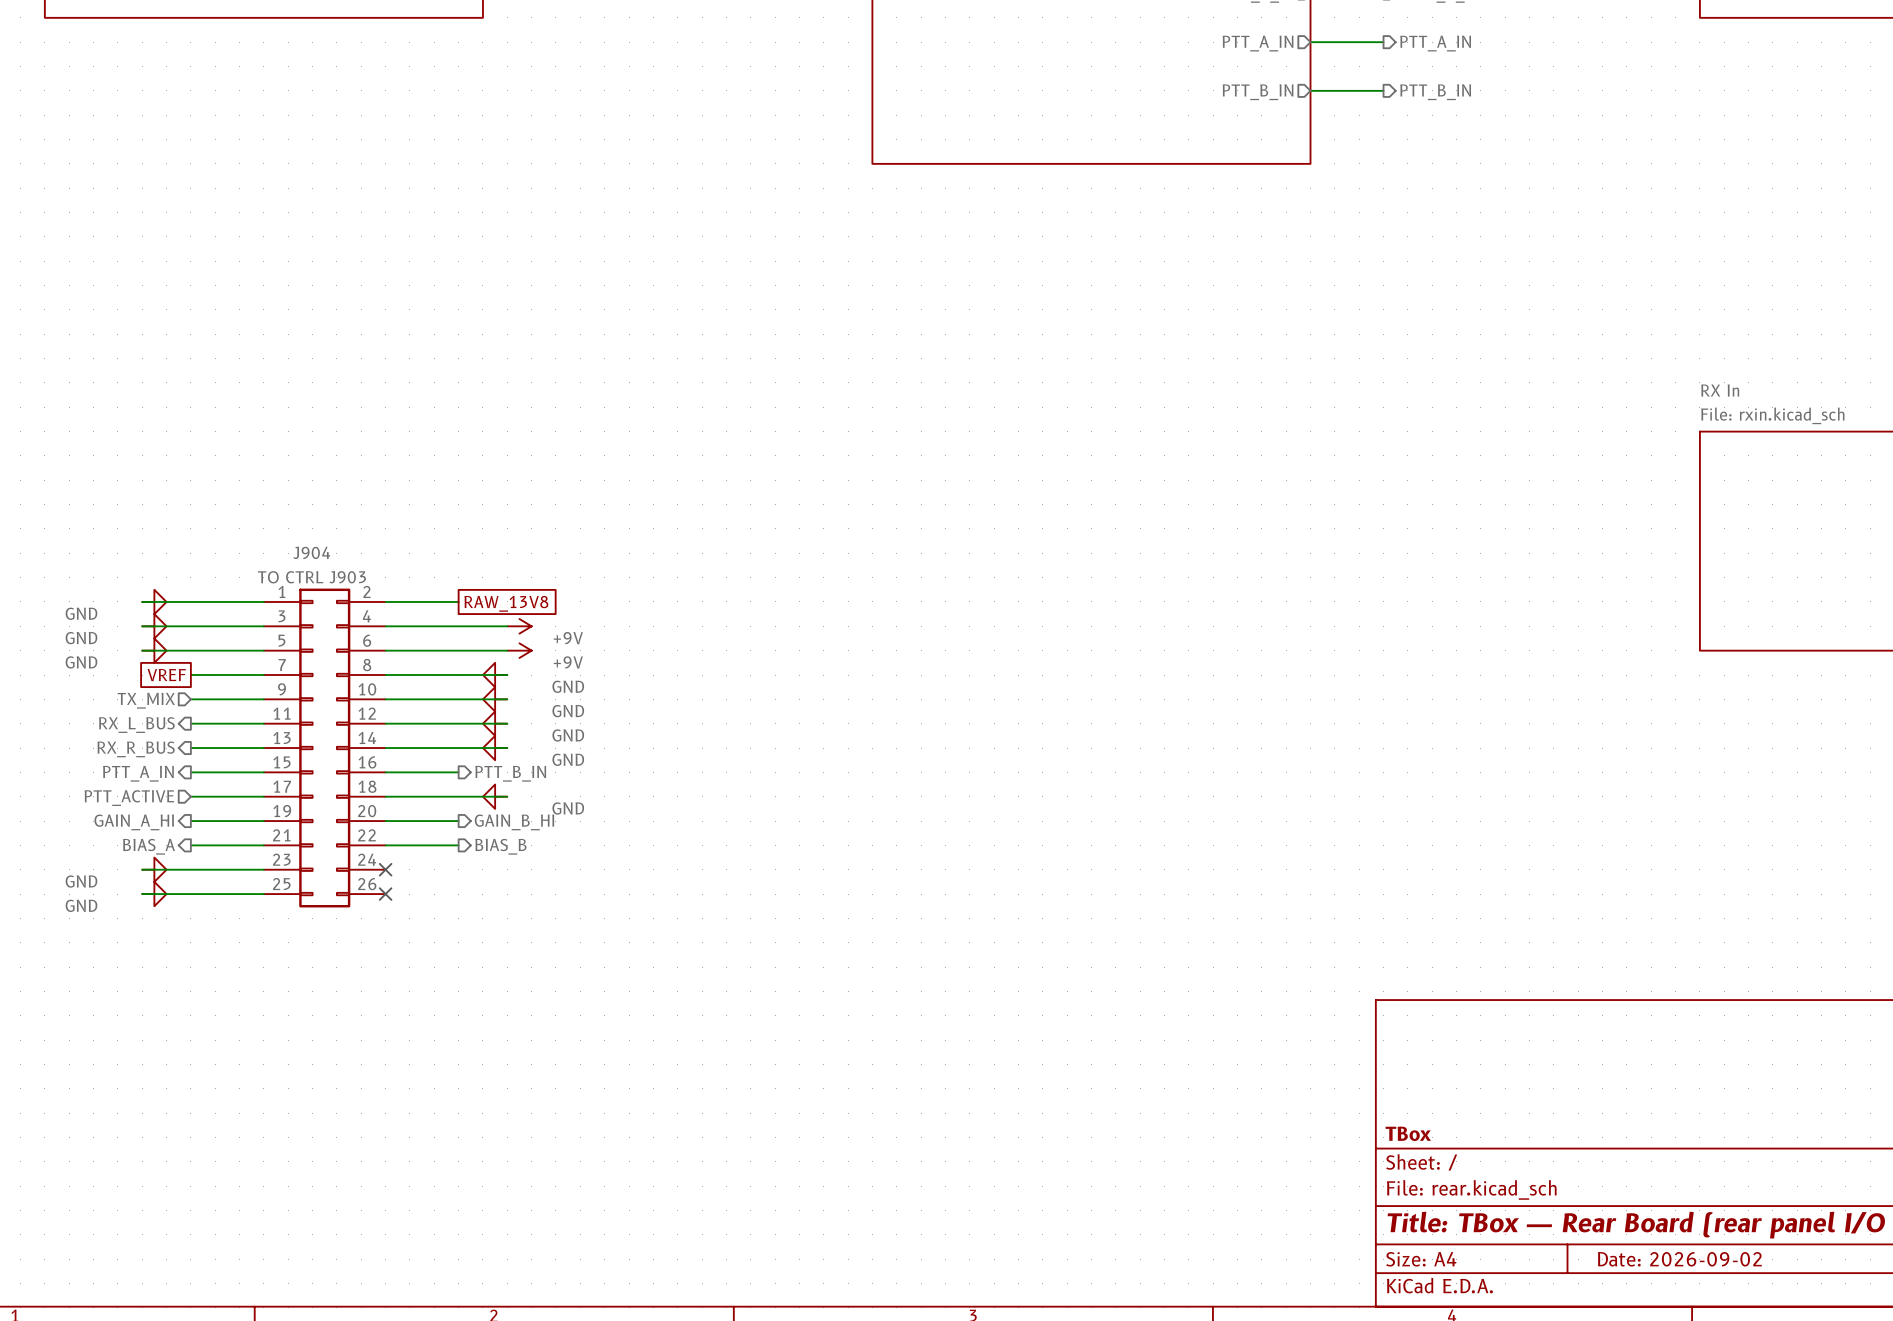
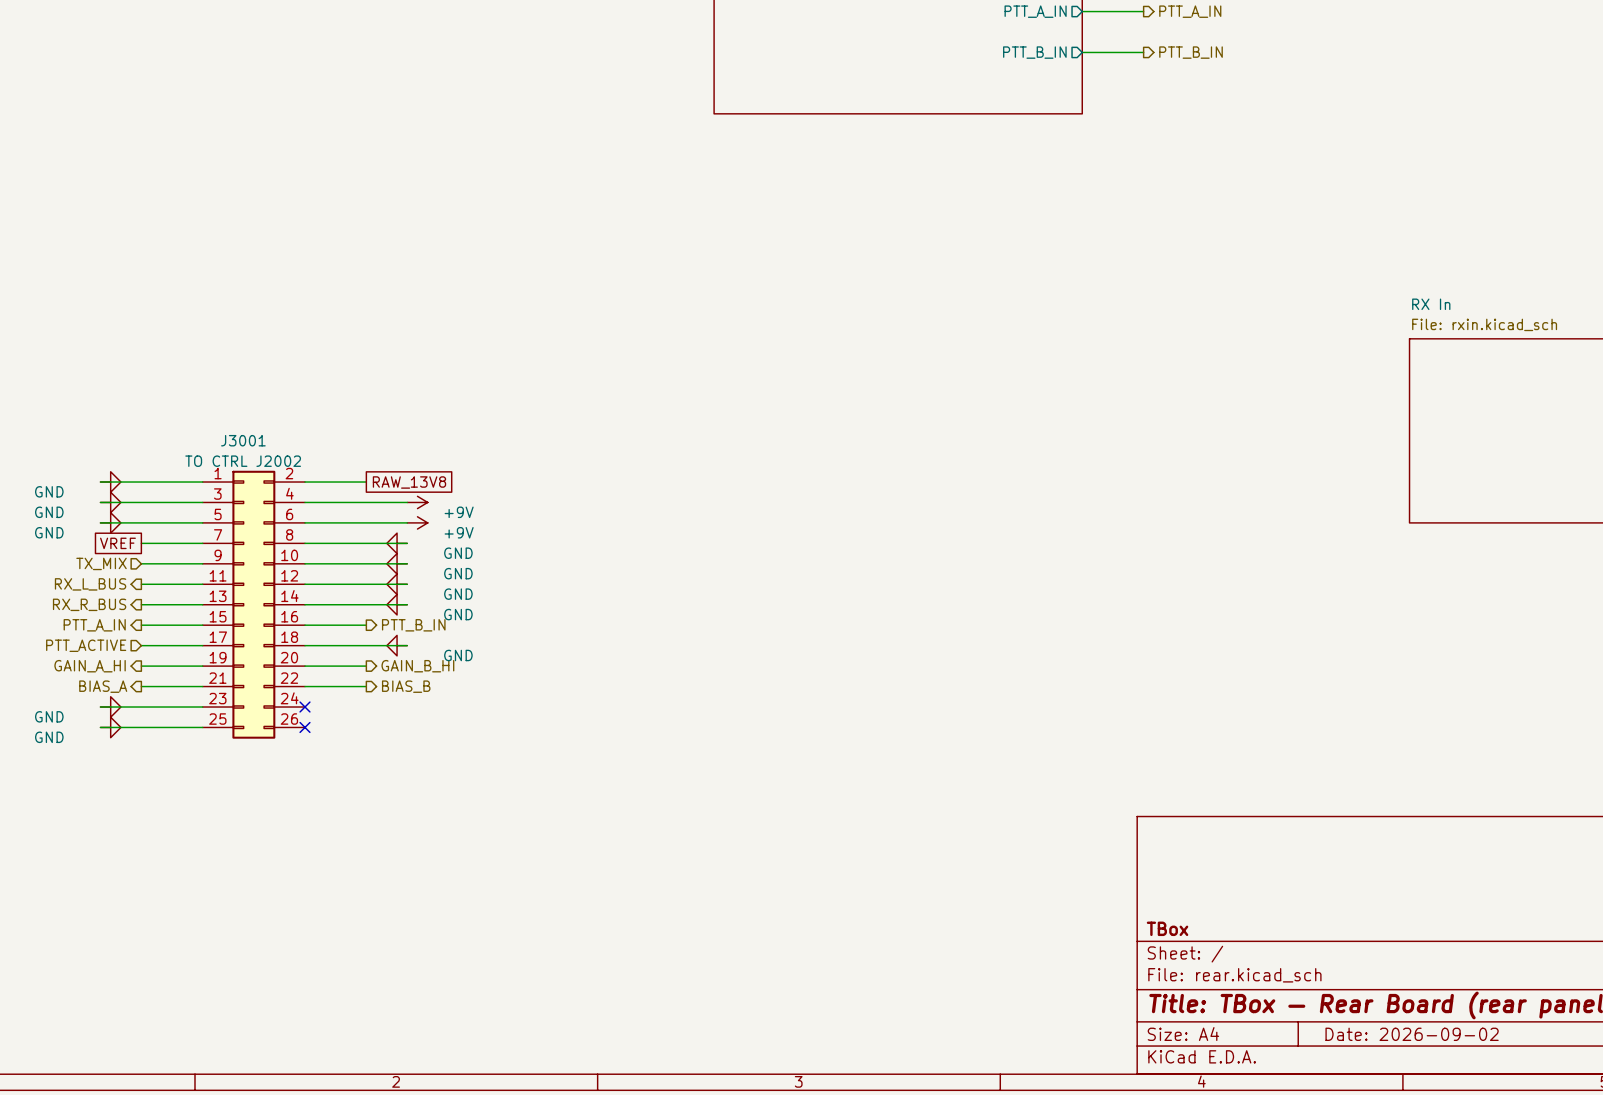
J904 name: J904 (311, 552) -> J3001 (243, 440)
J904 value: TO CTRL J903 (311, 577) -> TO CTRL J2002 (243, 461)

